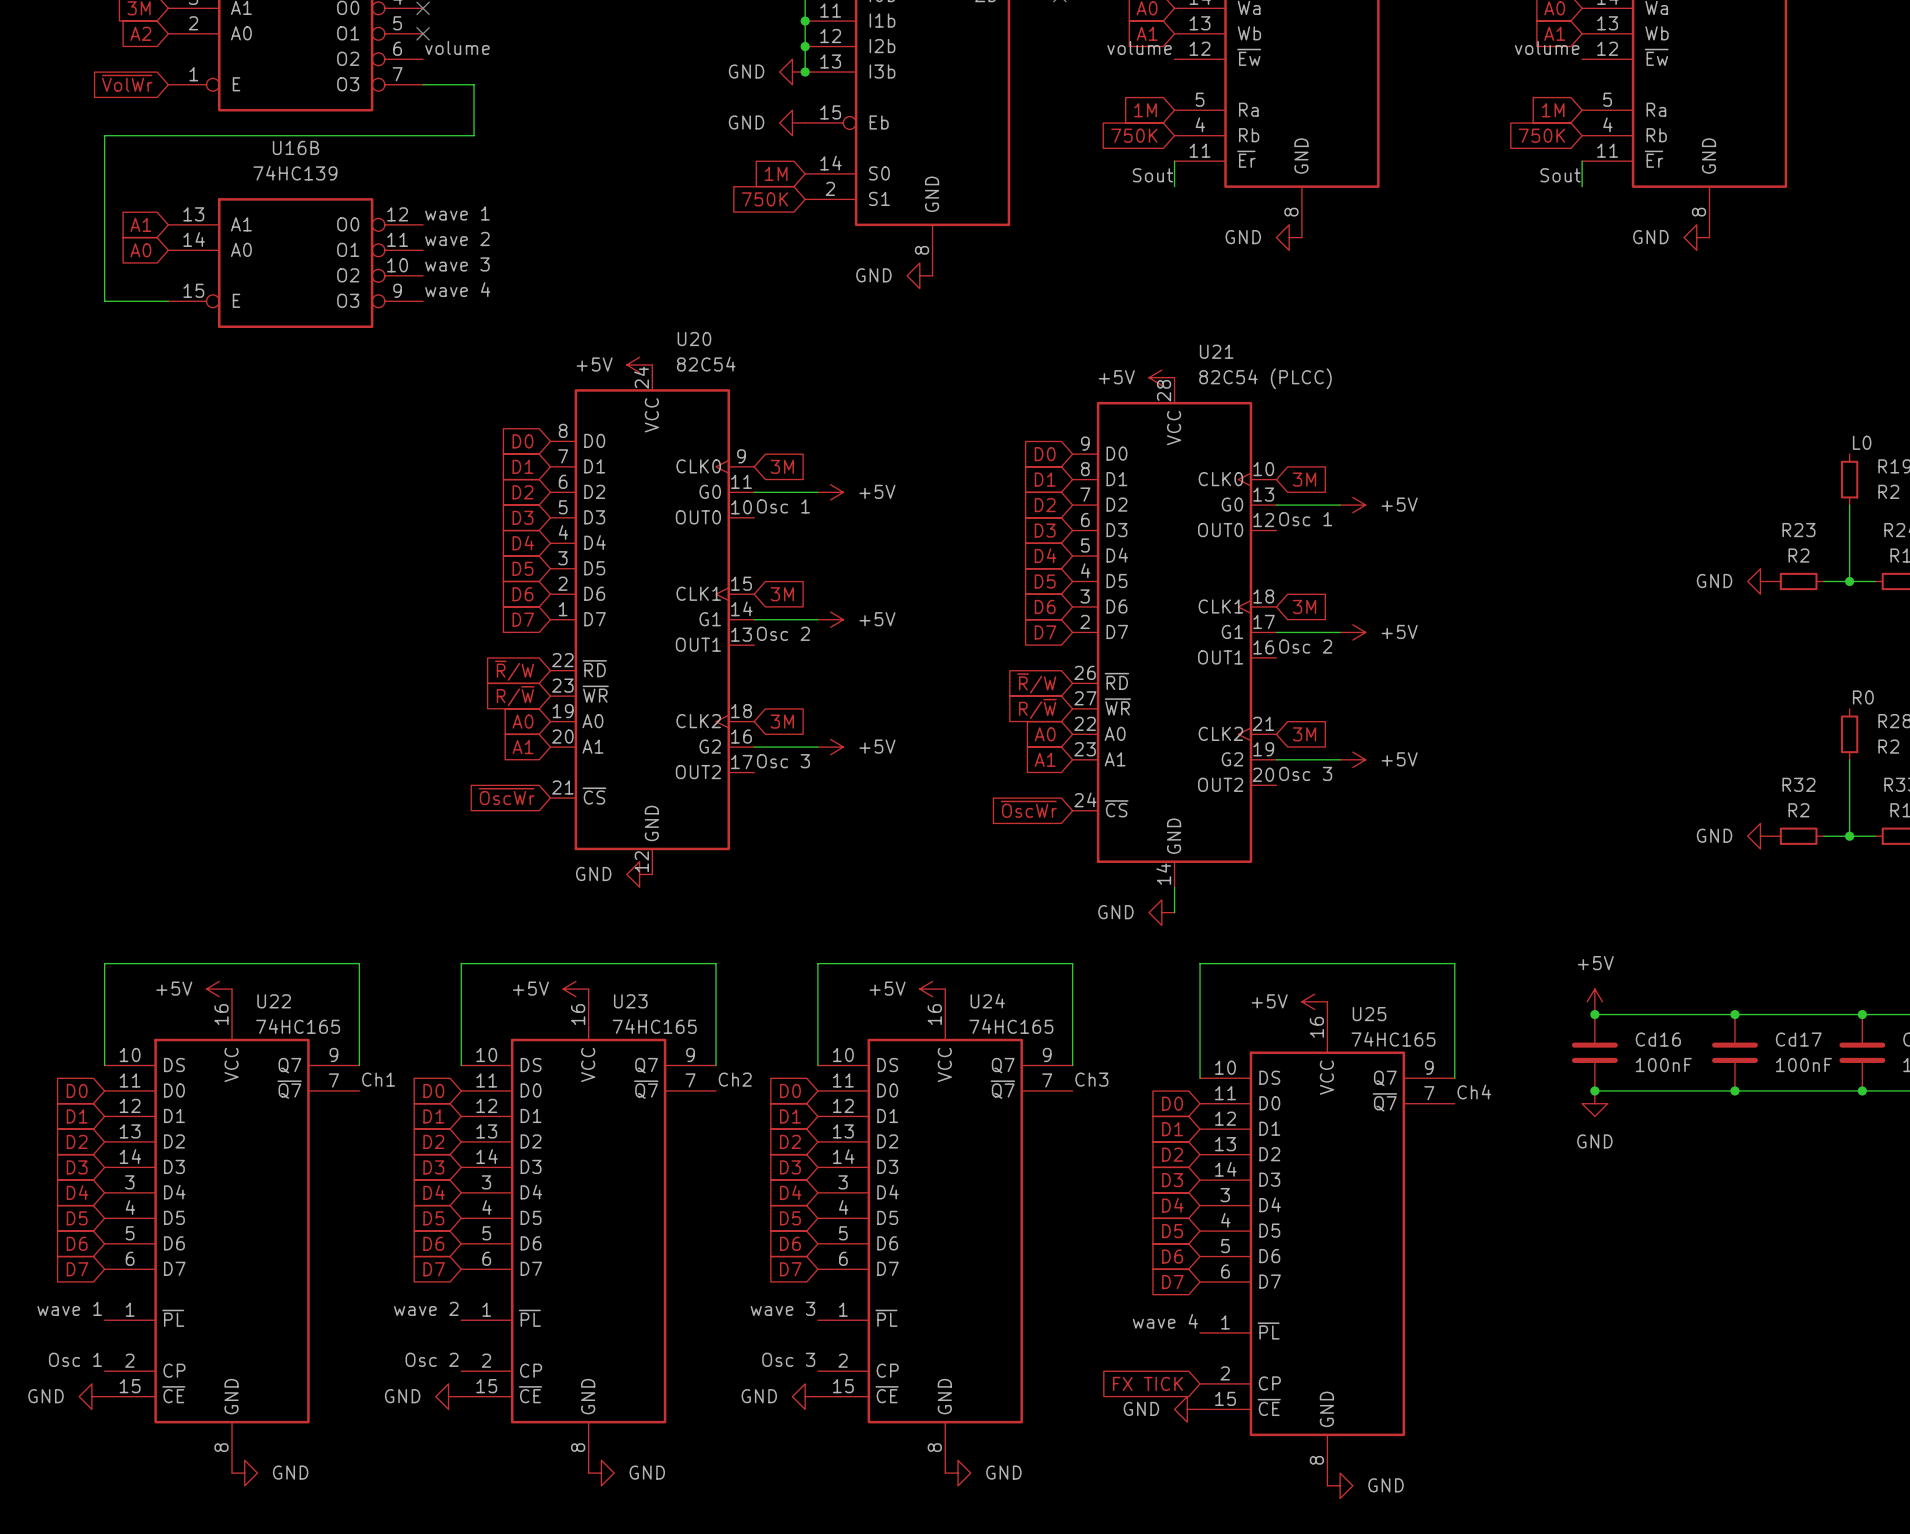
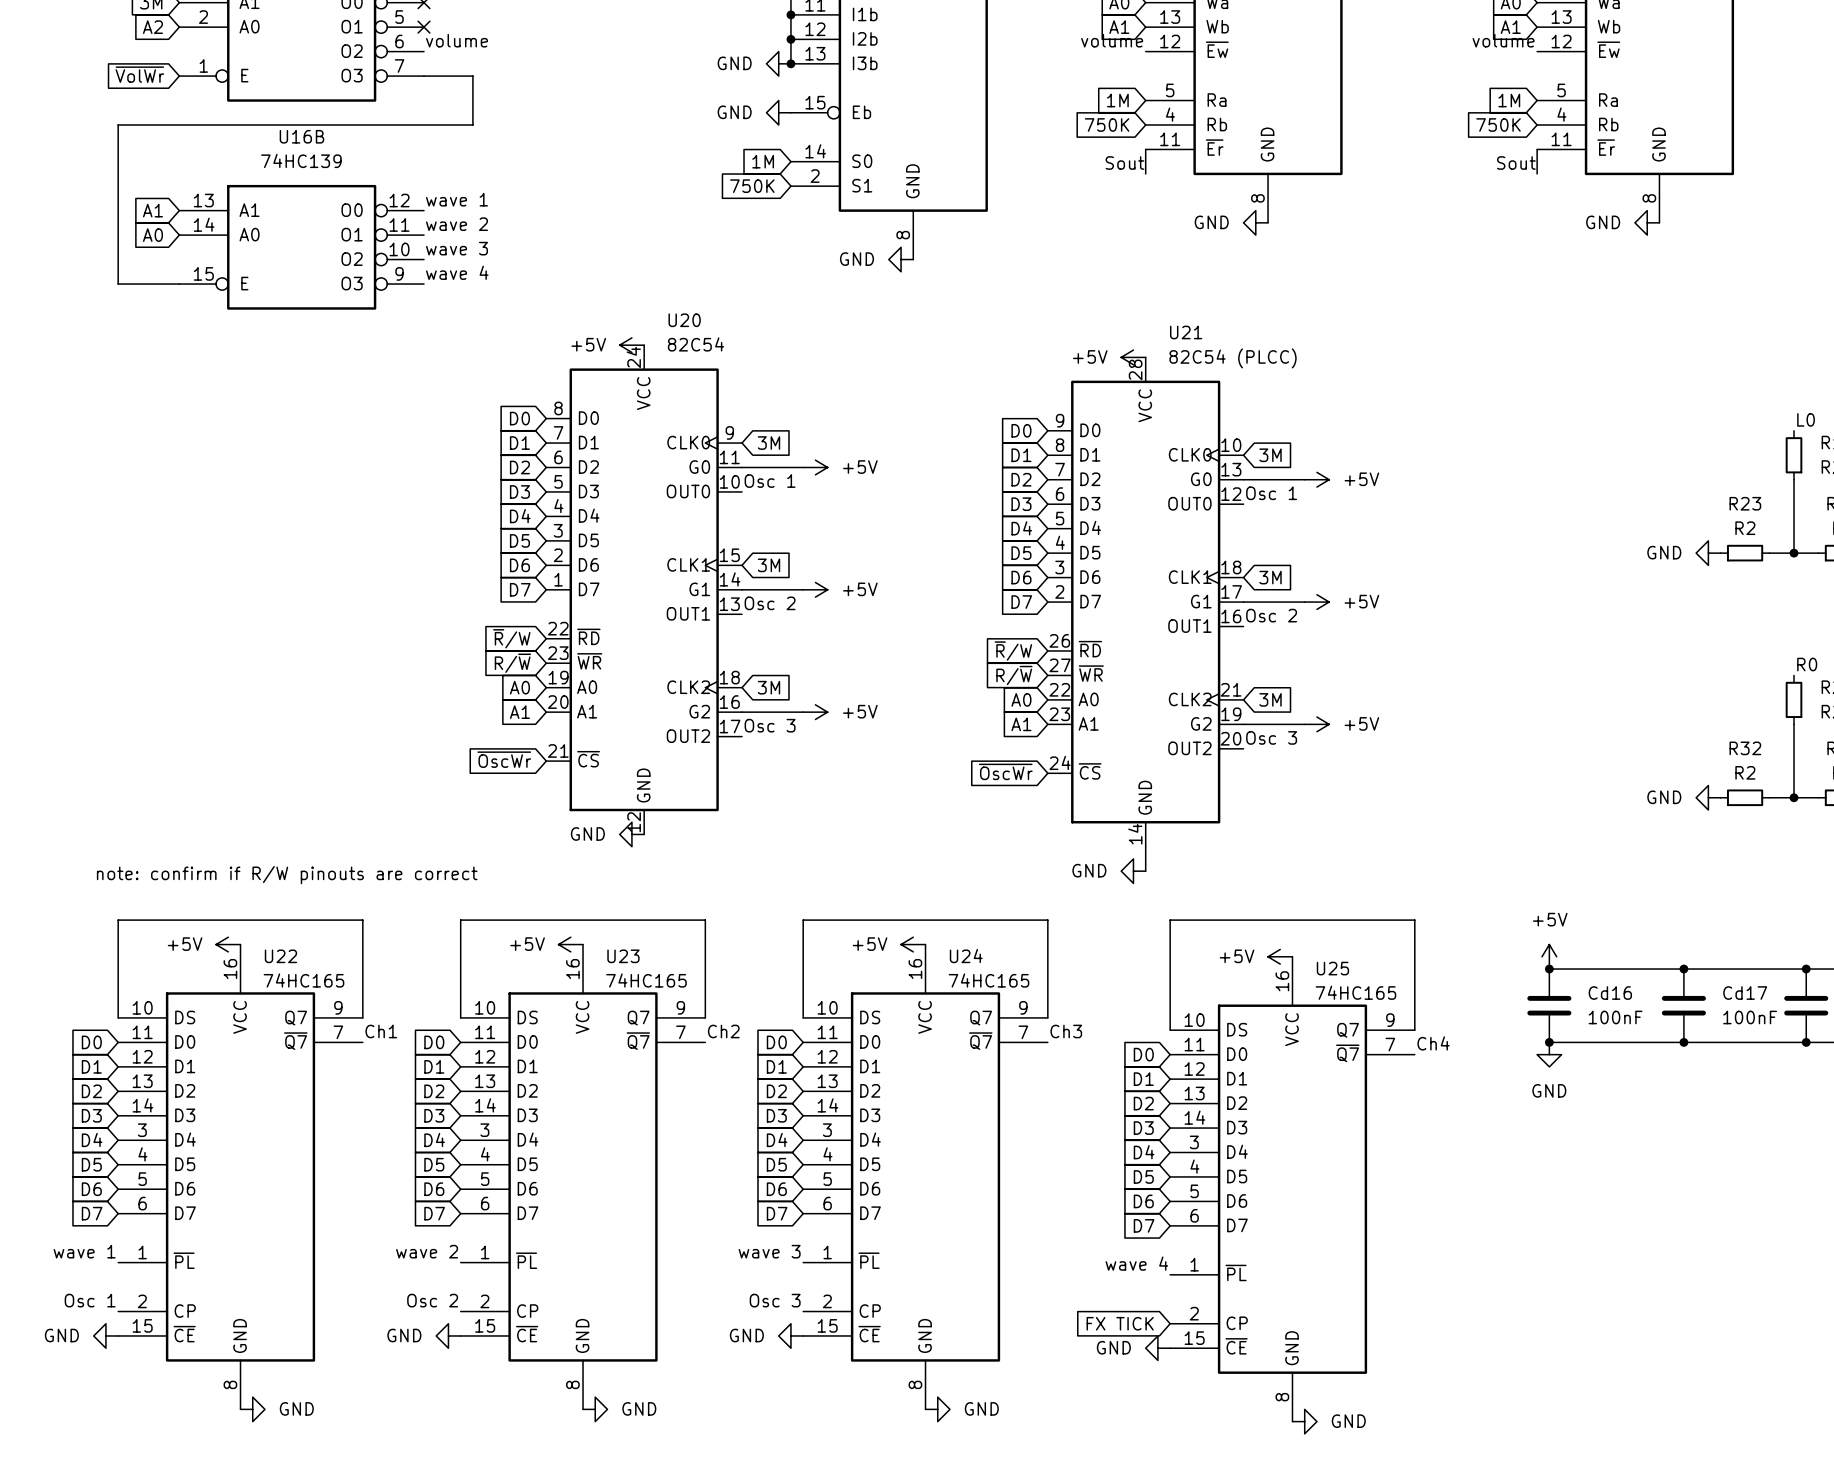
text: none -> note: confirm if R/W pinouts are correct (287, 875)

